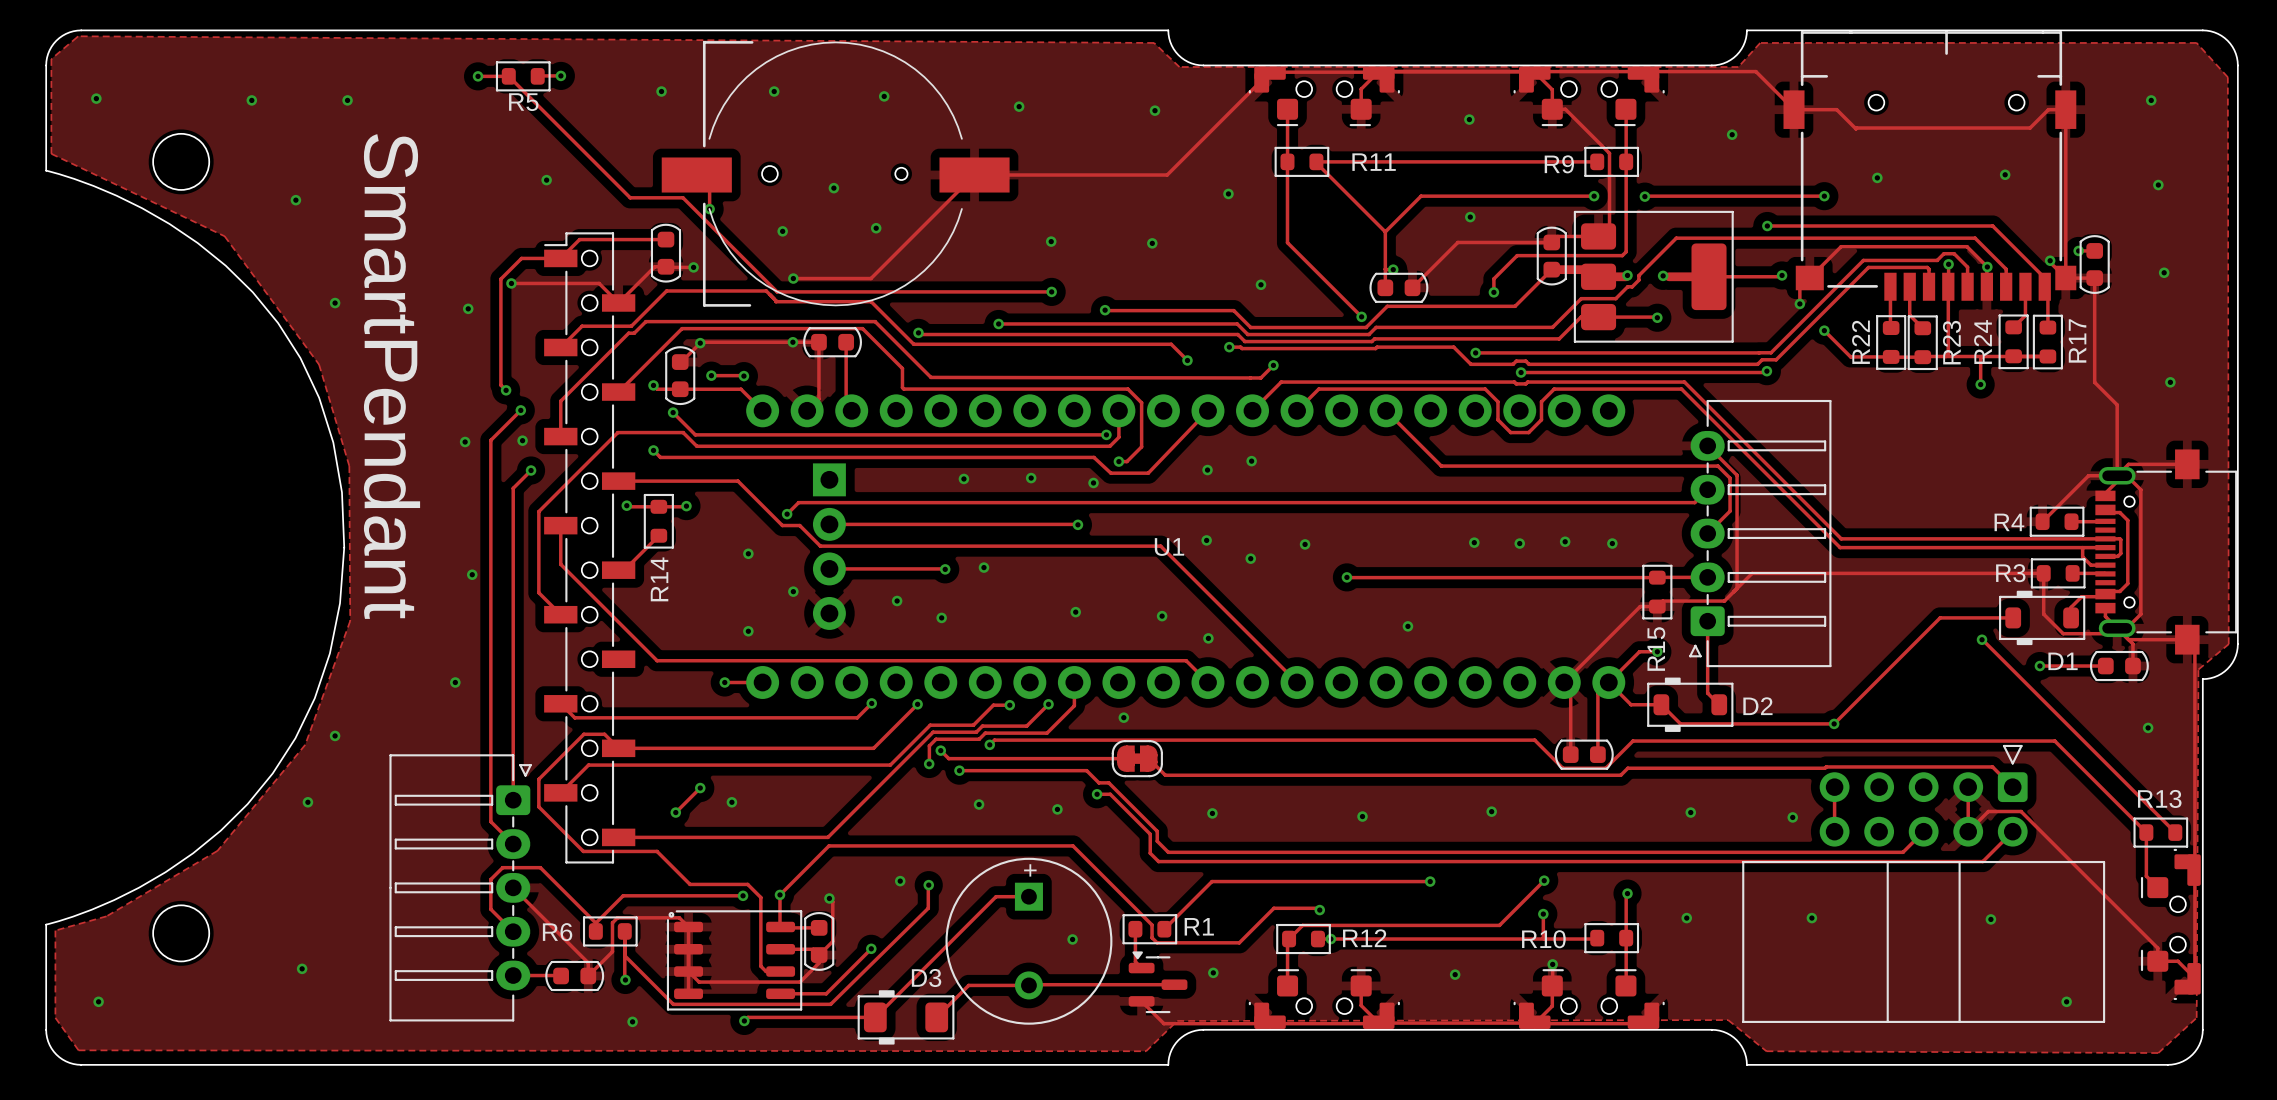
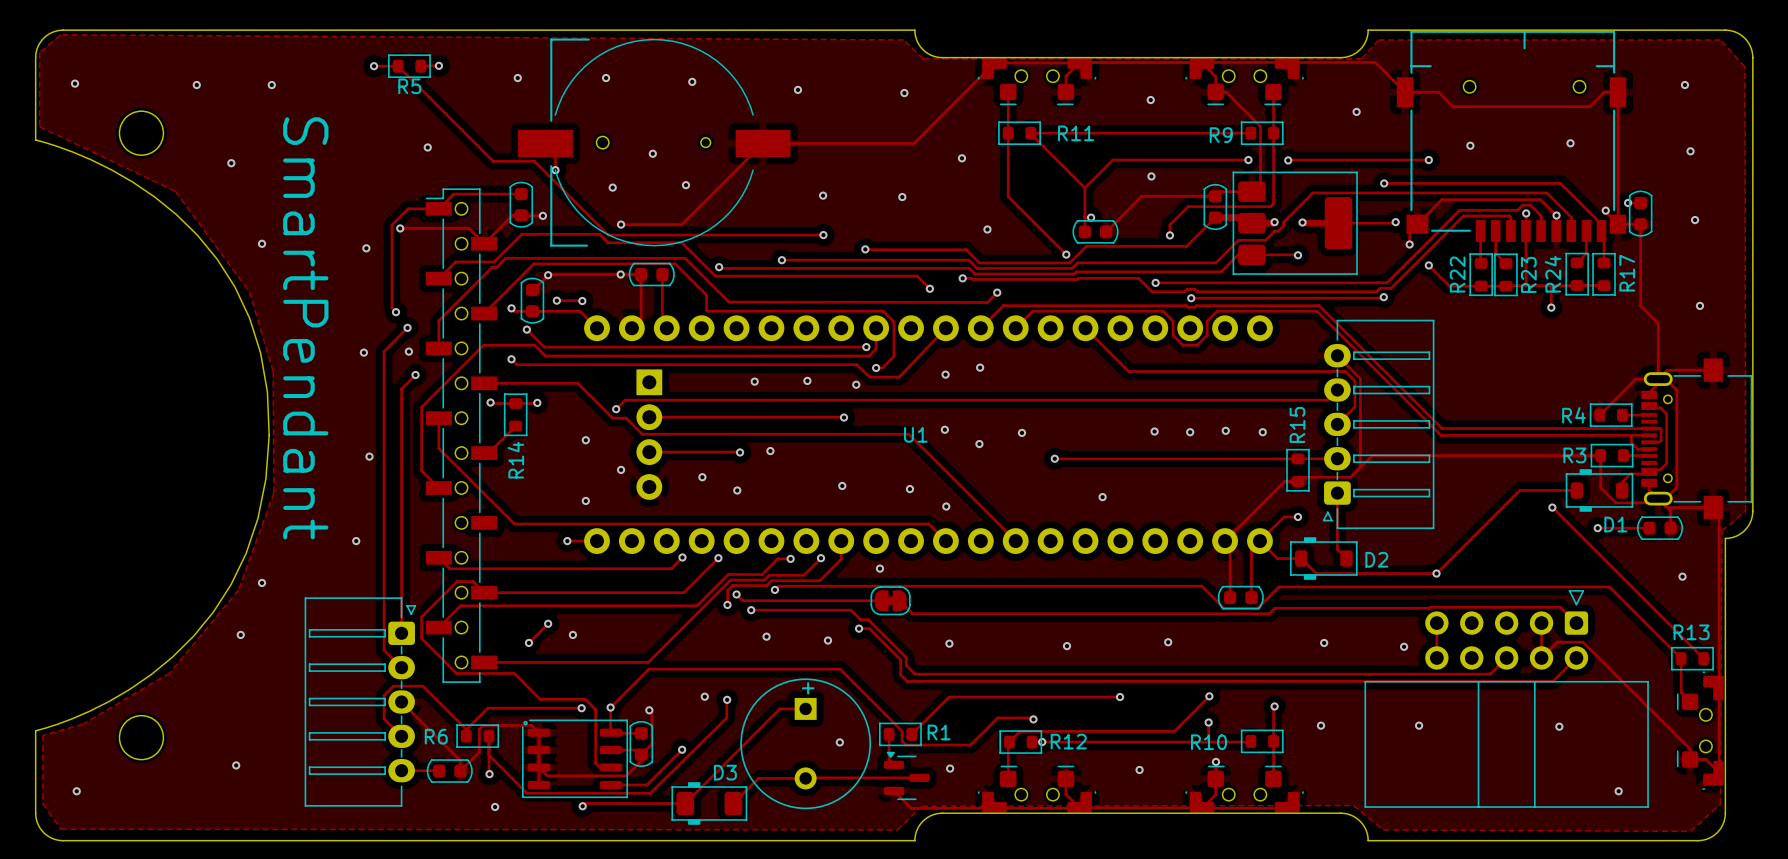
R15 name position: R15 (1656, 649) -> R15 (1297, 424)

